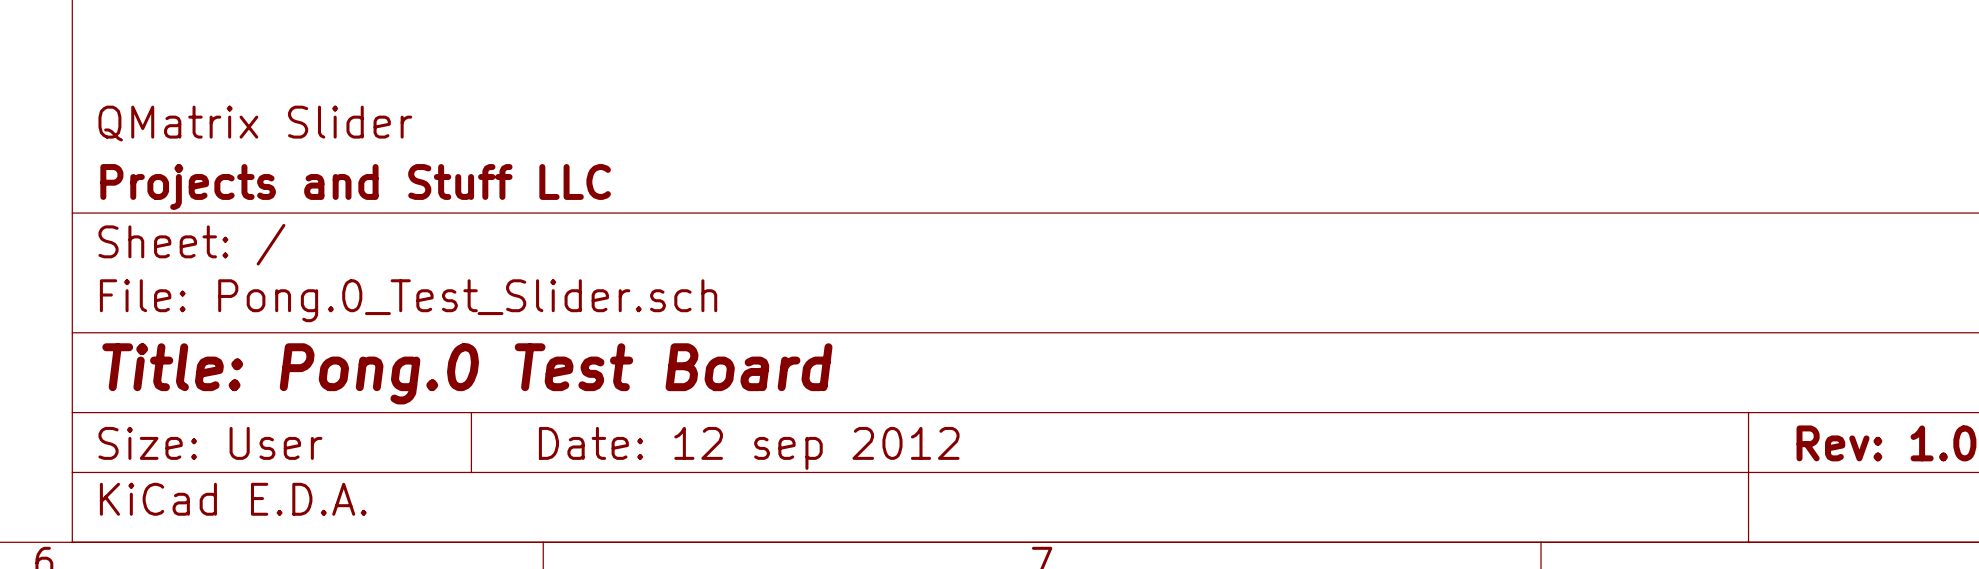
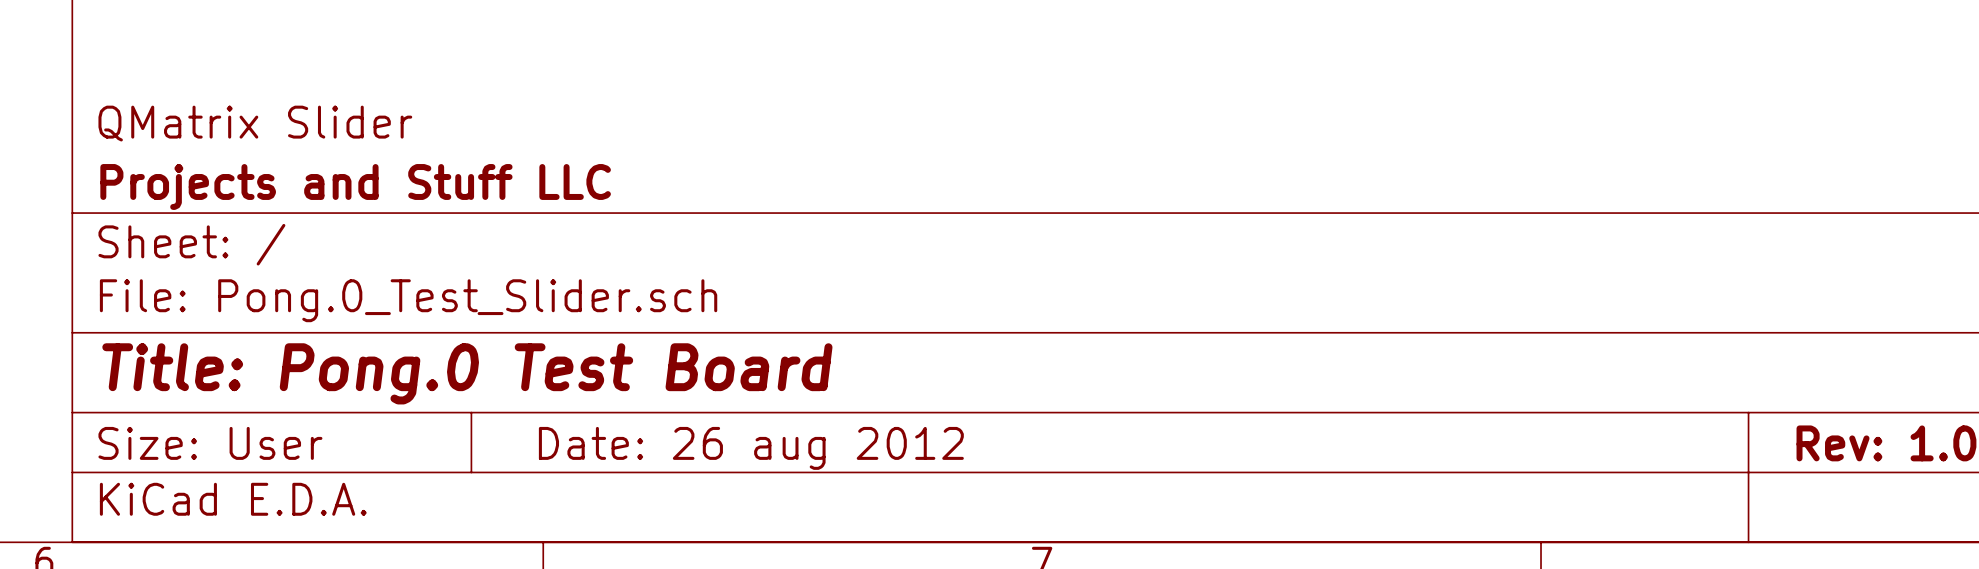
title block: Date: 12 sep 2012 (749, 448) -> Date: 26 aug 2012 (751, 448)

